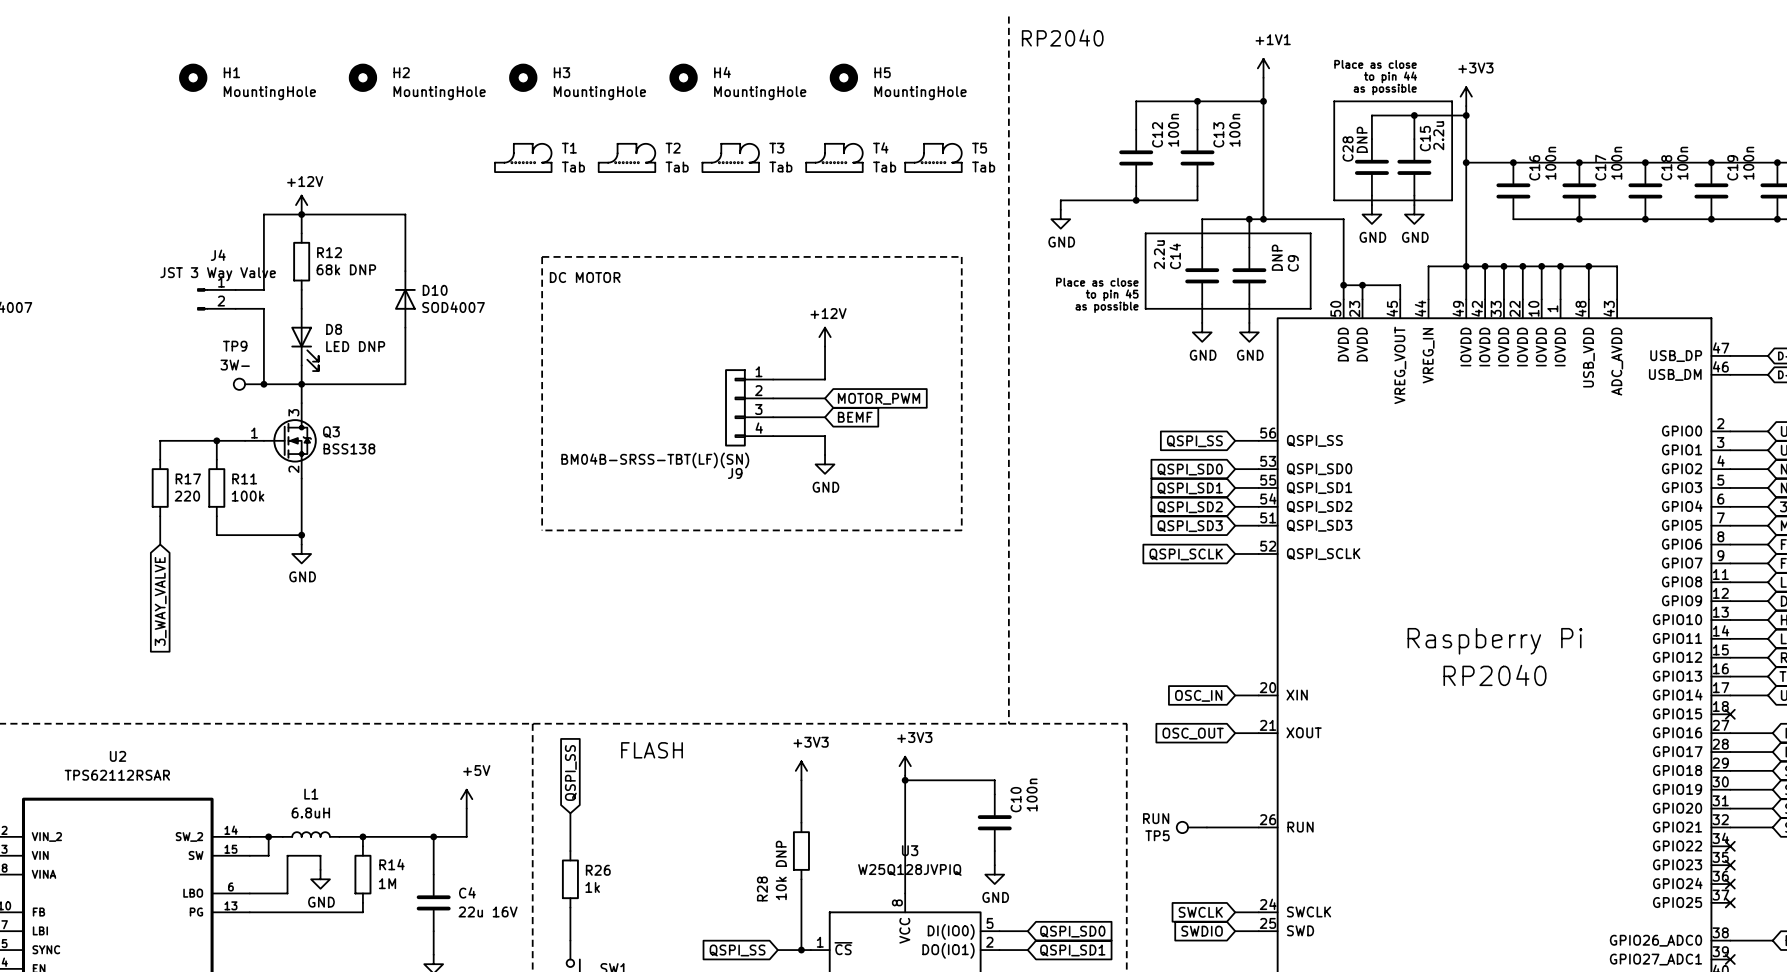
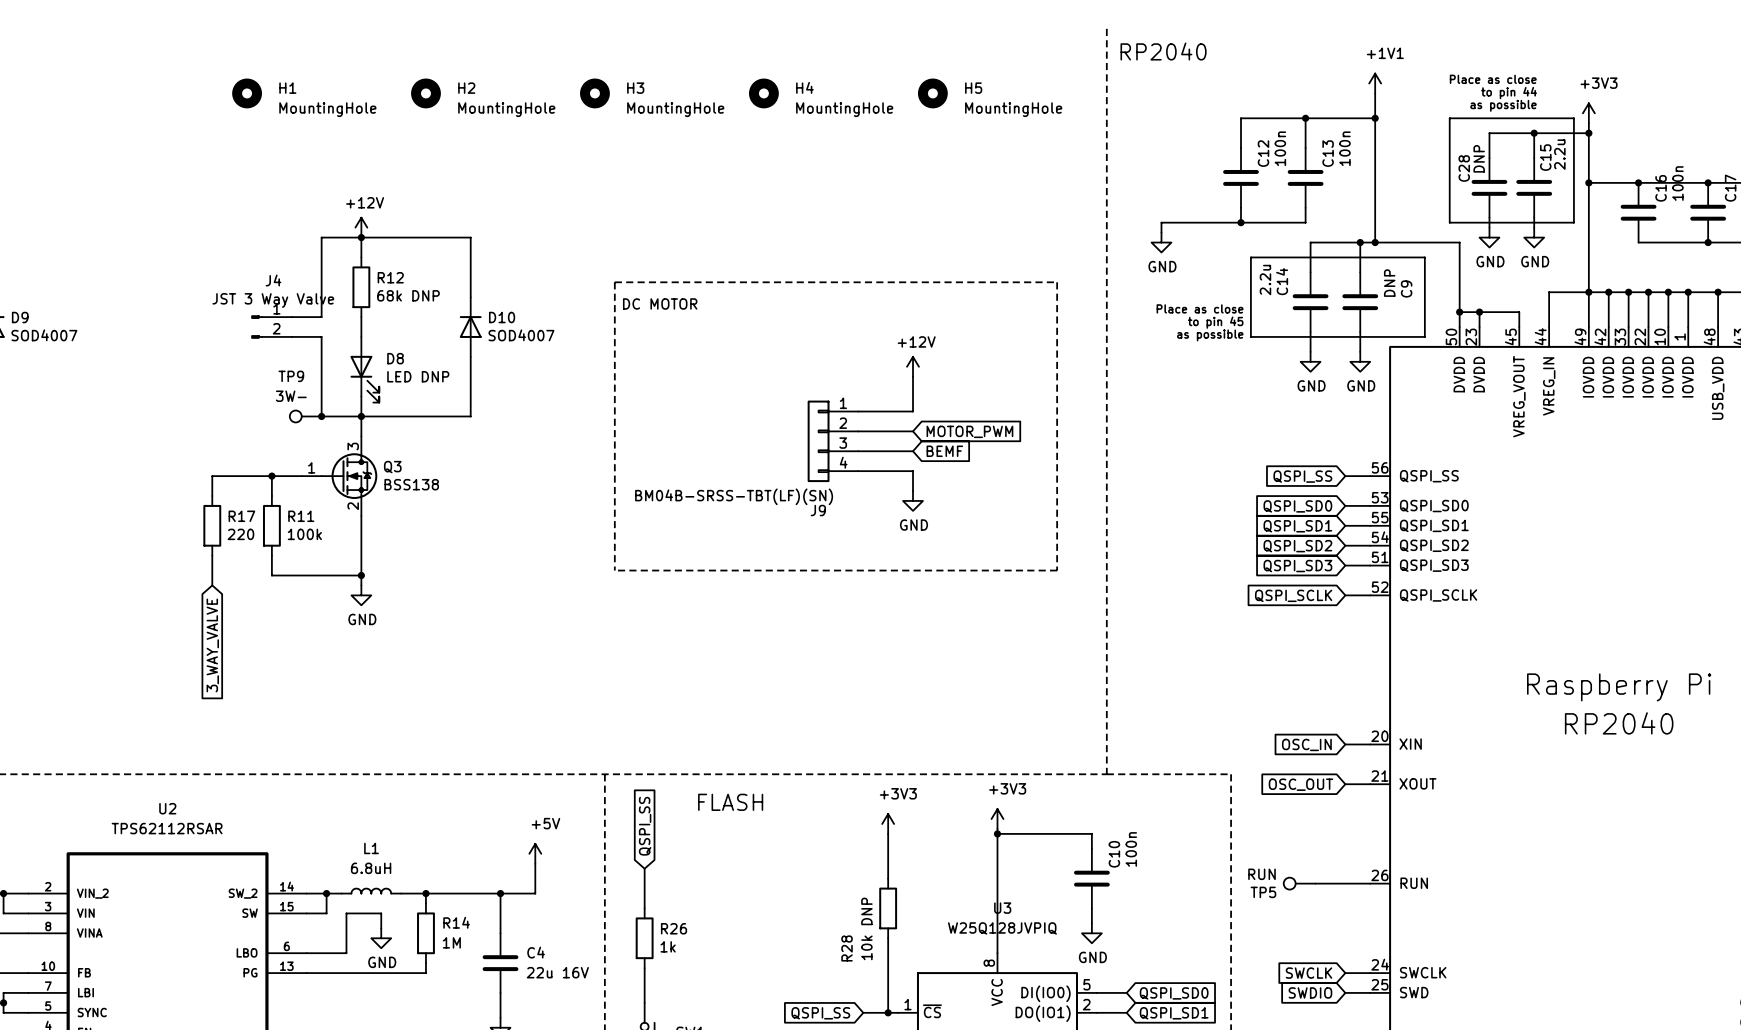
T1: Tab (523, 157) -> none
T2: Tab (626, 157) -> none
T3: Tab (730, 157) -> none
T4: Tab (834, 157) -> none
T5: Tab (933, 157) -> none

